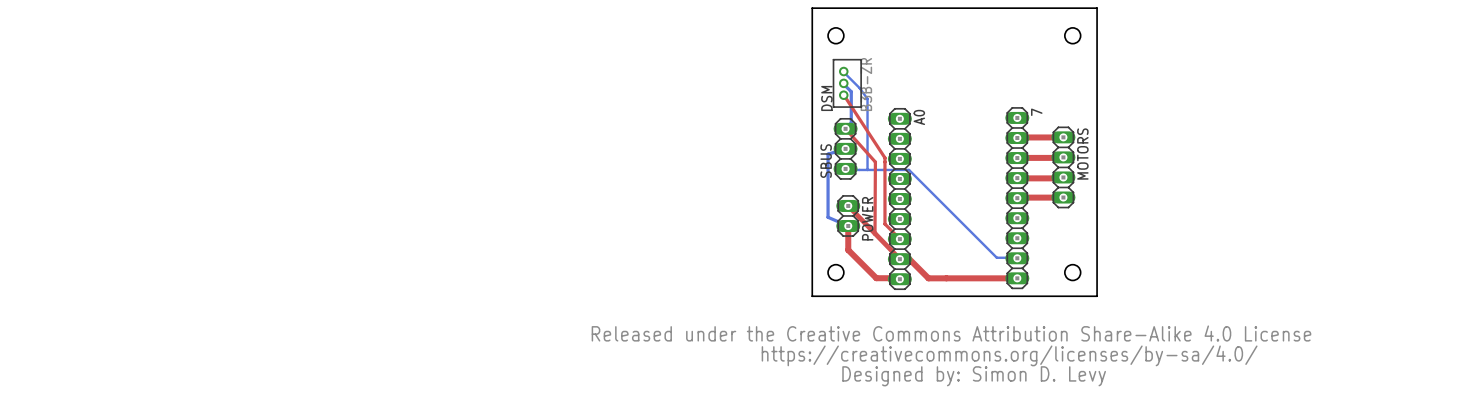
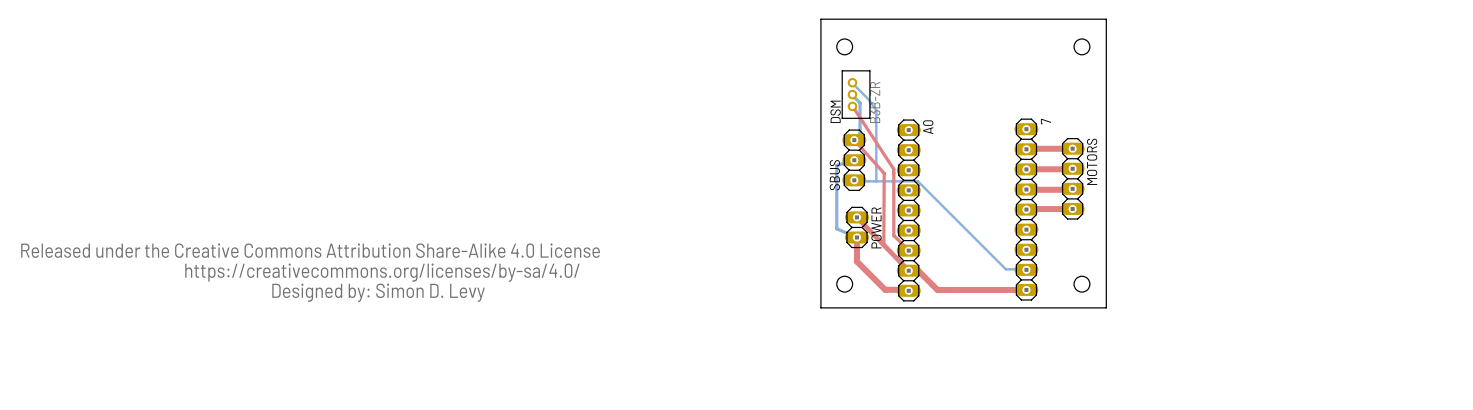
drawing: none -> [21, 243, 600, 302]
drawing: [591, 325, 1312, 387] -> none

